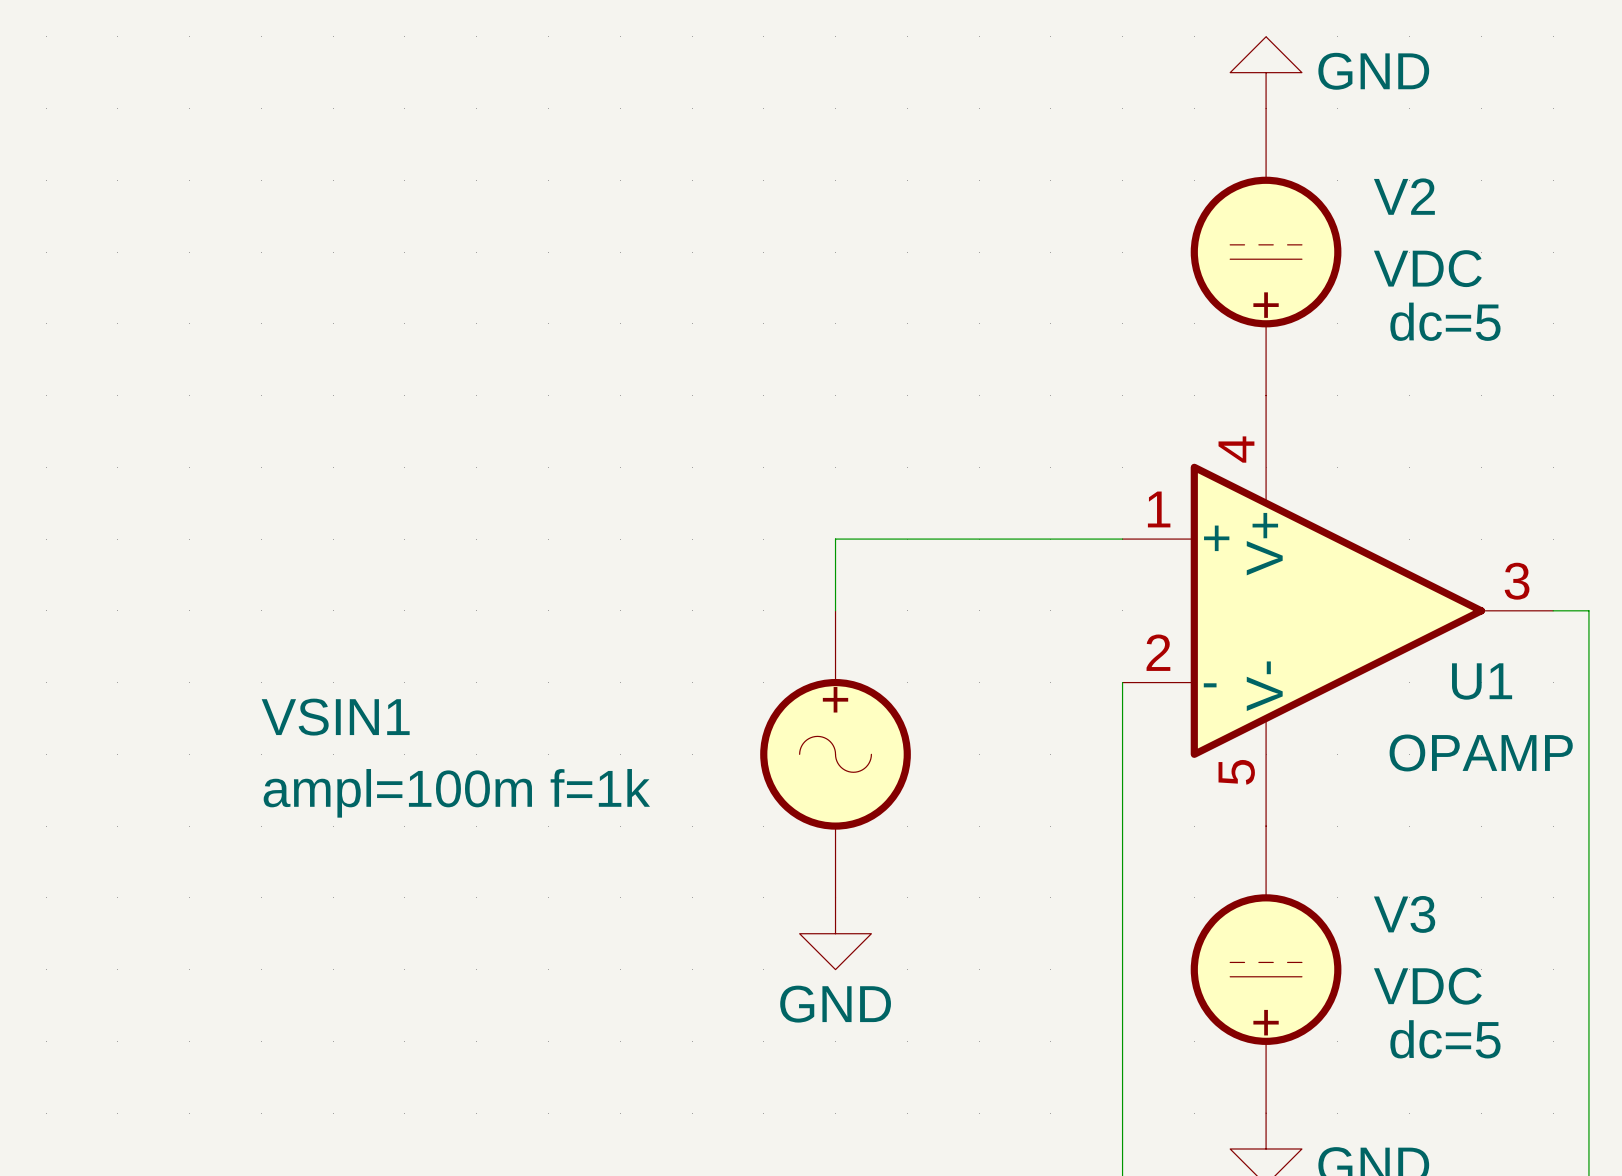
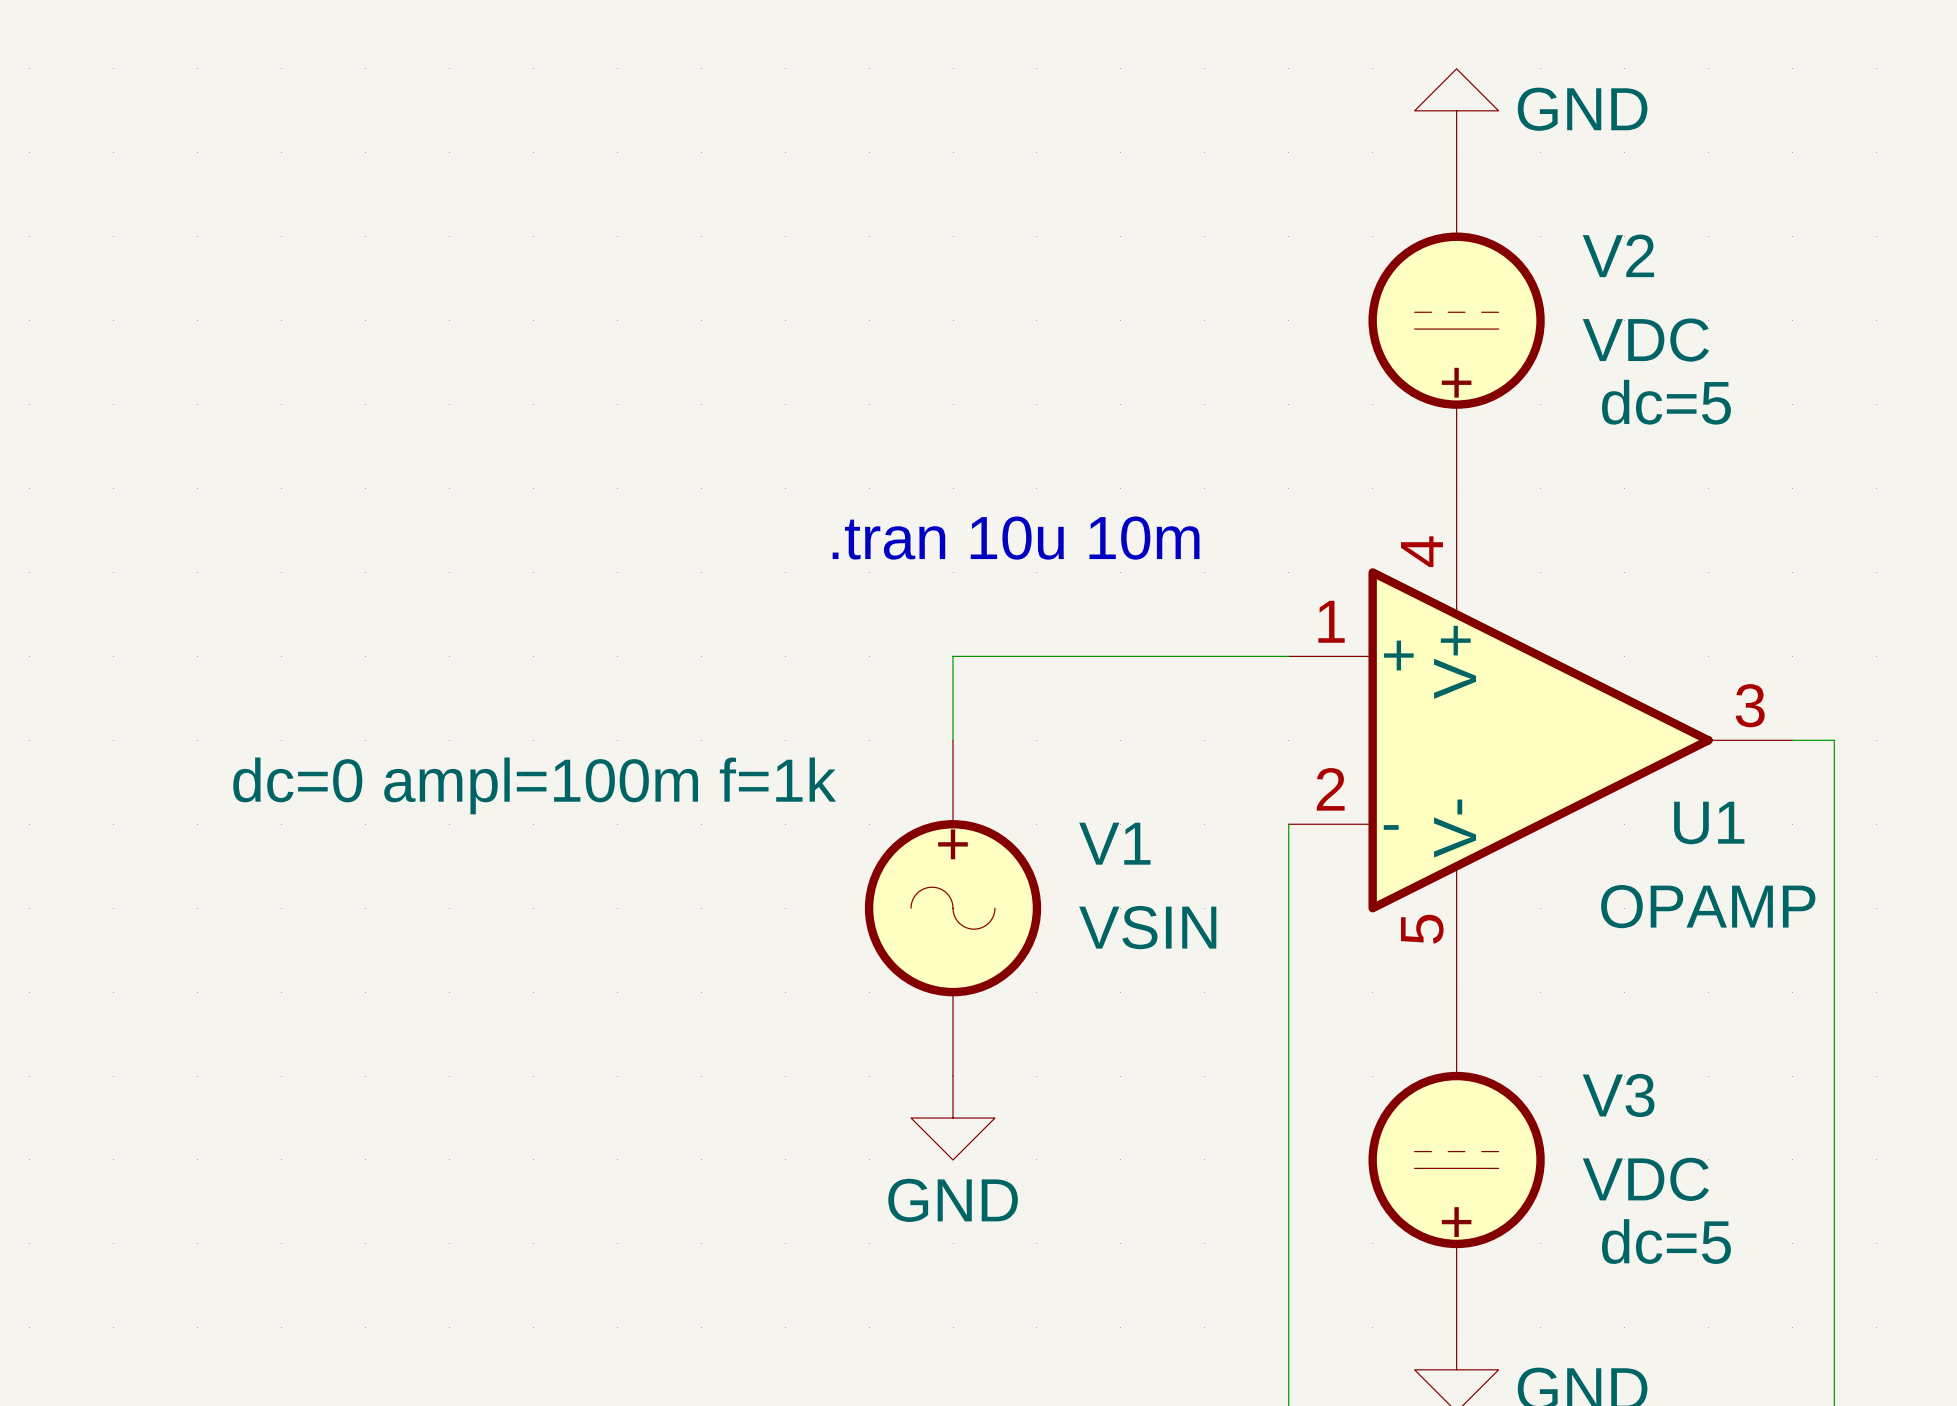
text: none -> .tran 10u 10m (1016, 538)
VSIN1 text: none -> dc=0 ampl=100m f=1k (534, 785)
VSIN1 name: VSIN1 (335, 717) -> V1 (1114, 843)
VSIN1 value: ampl=100m f=1k (456, 793) -> VSIN (1147, 927)

